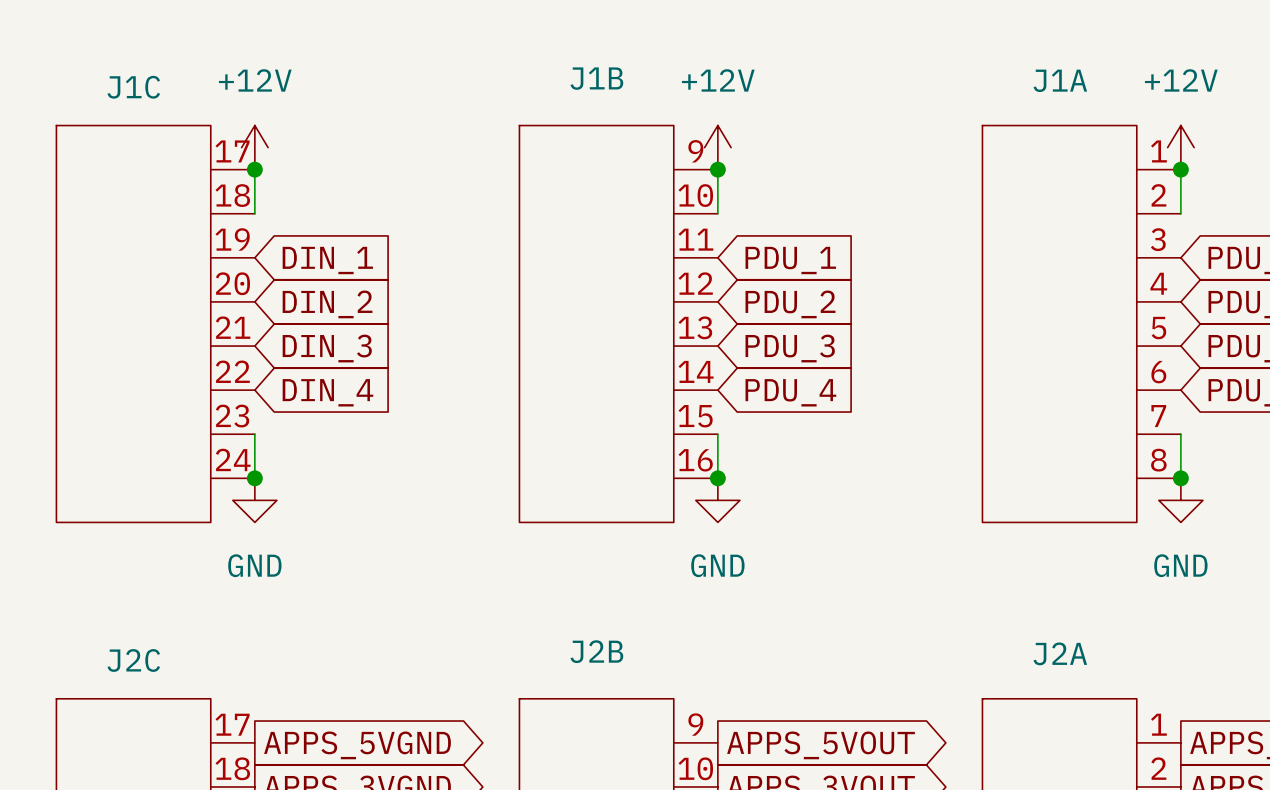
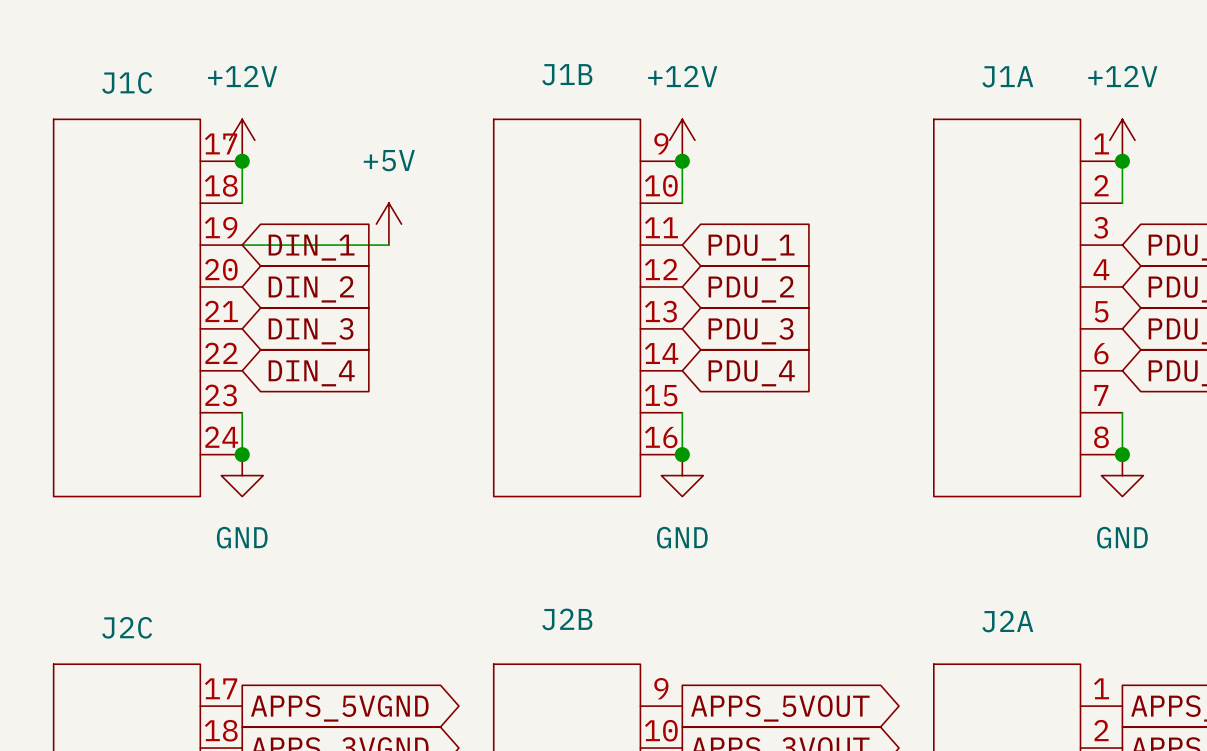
power symbol: none -> +5V (388, 224)
wire: none -> (242, 245) (388, 245)

